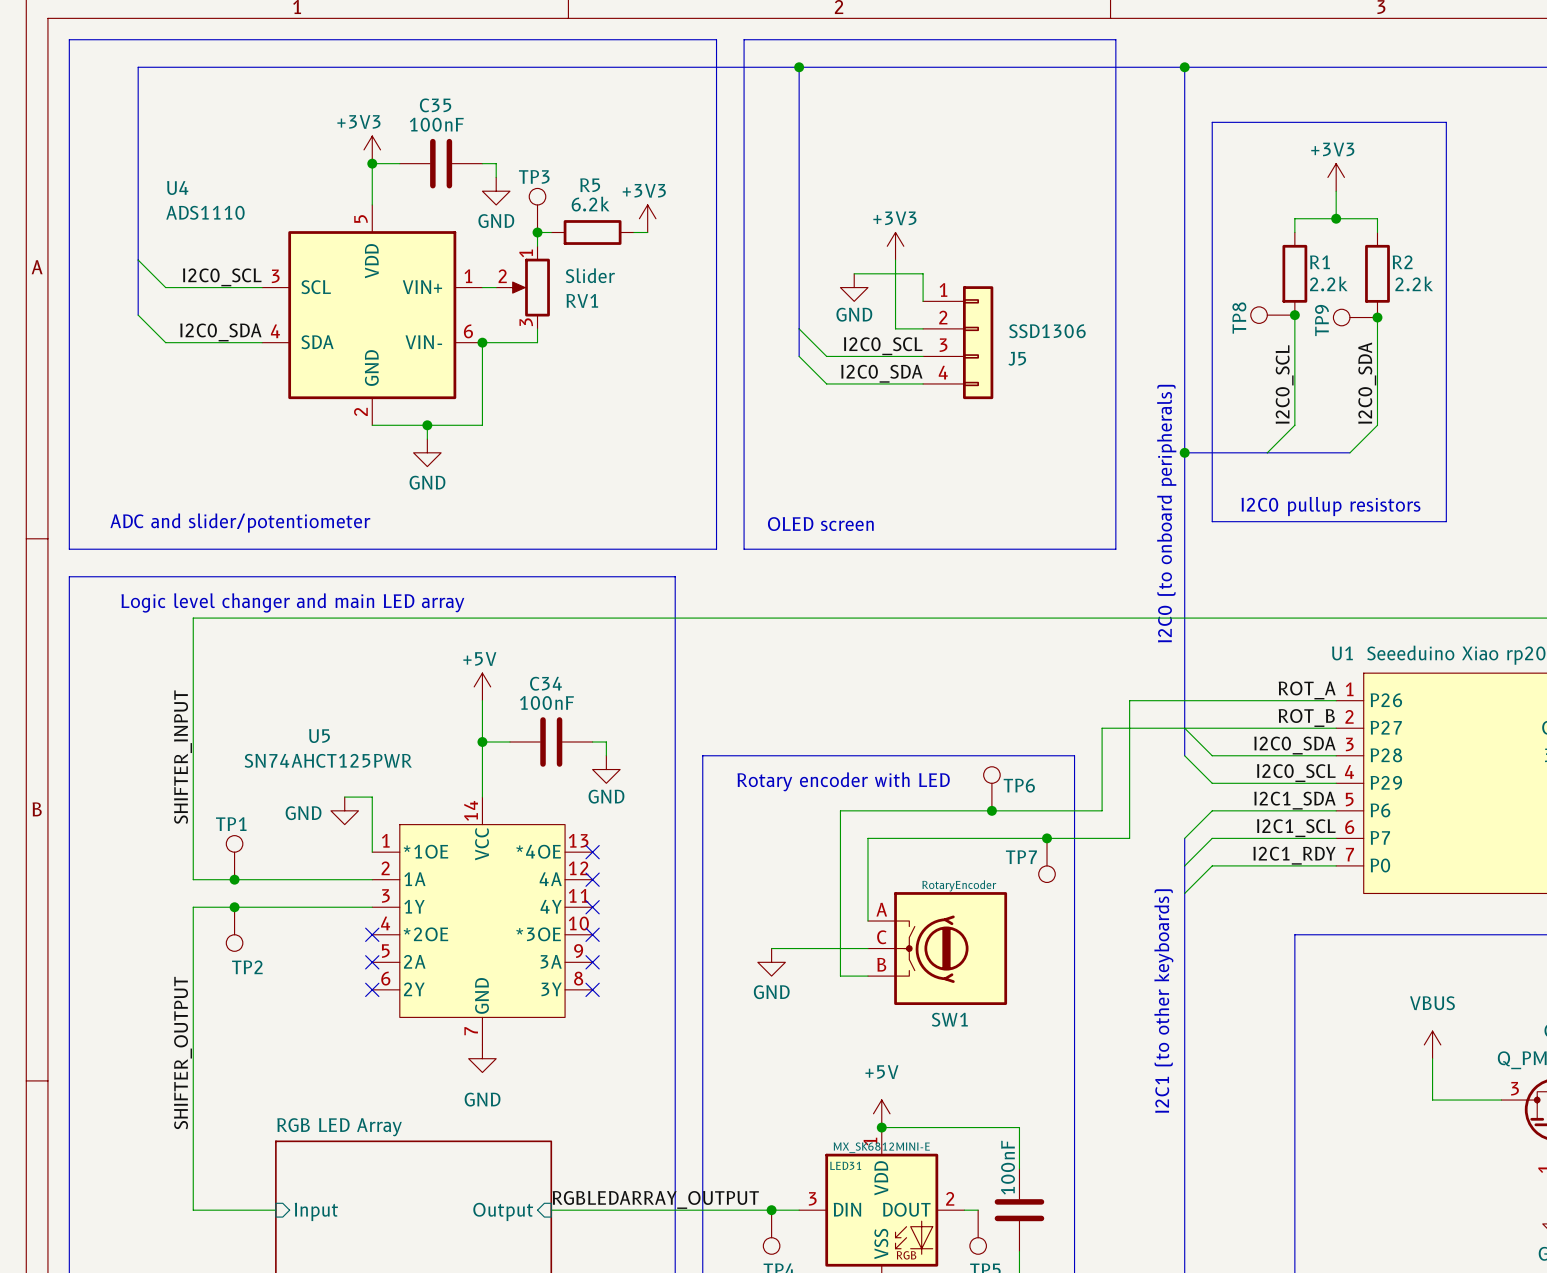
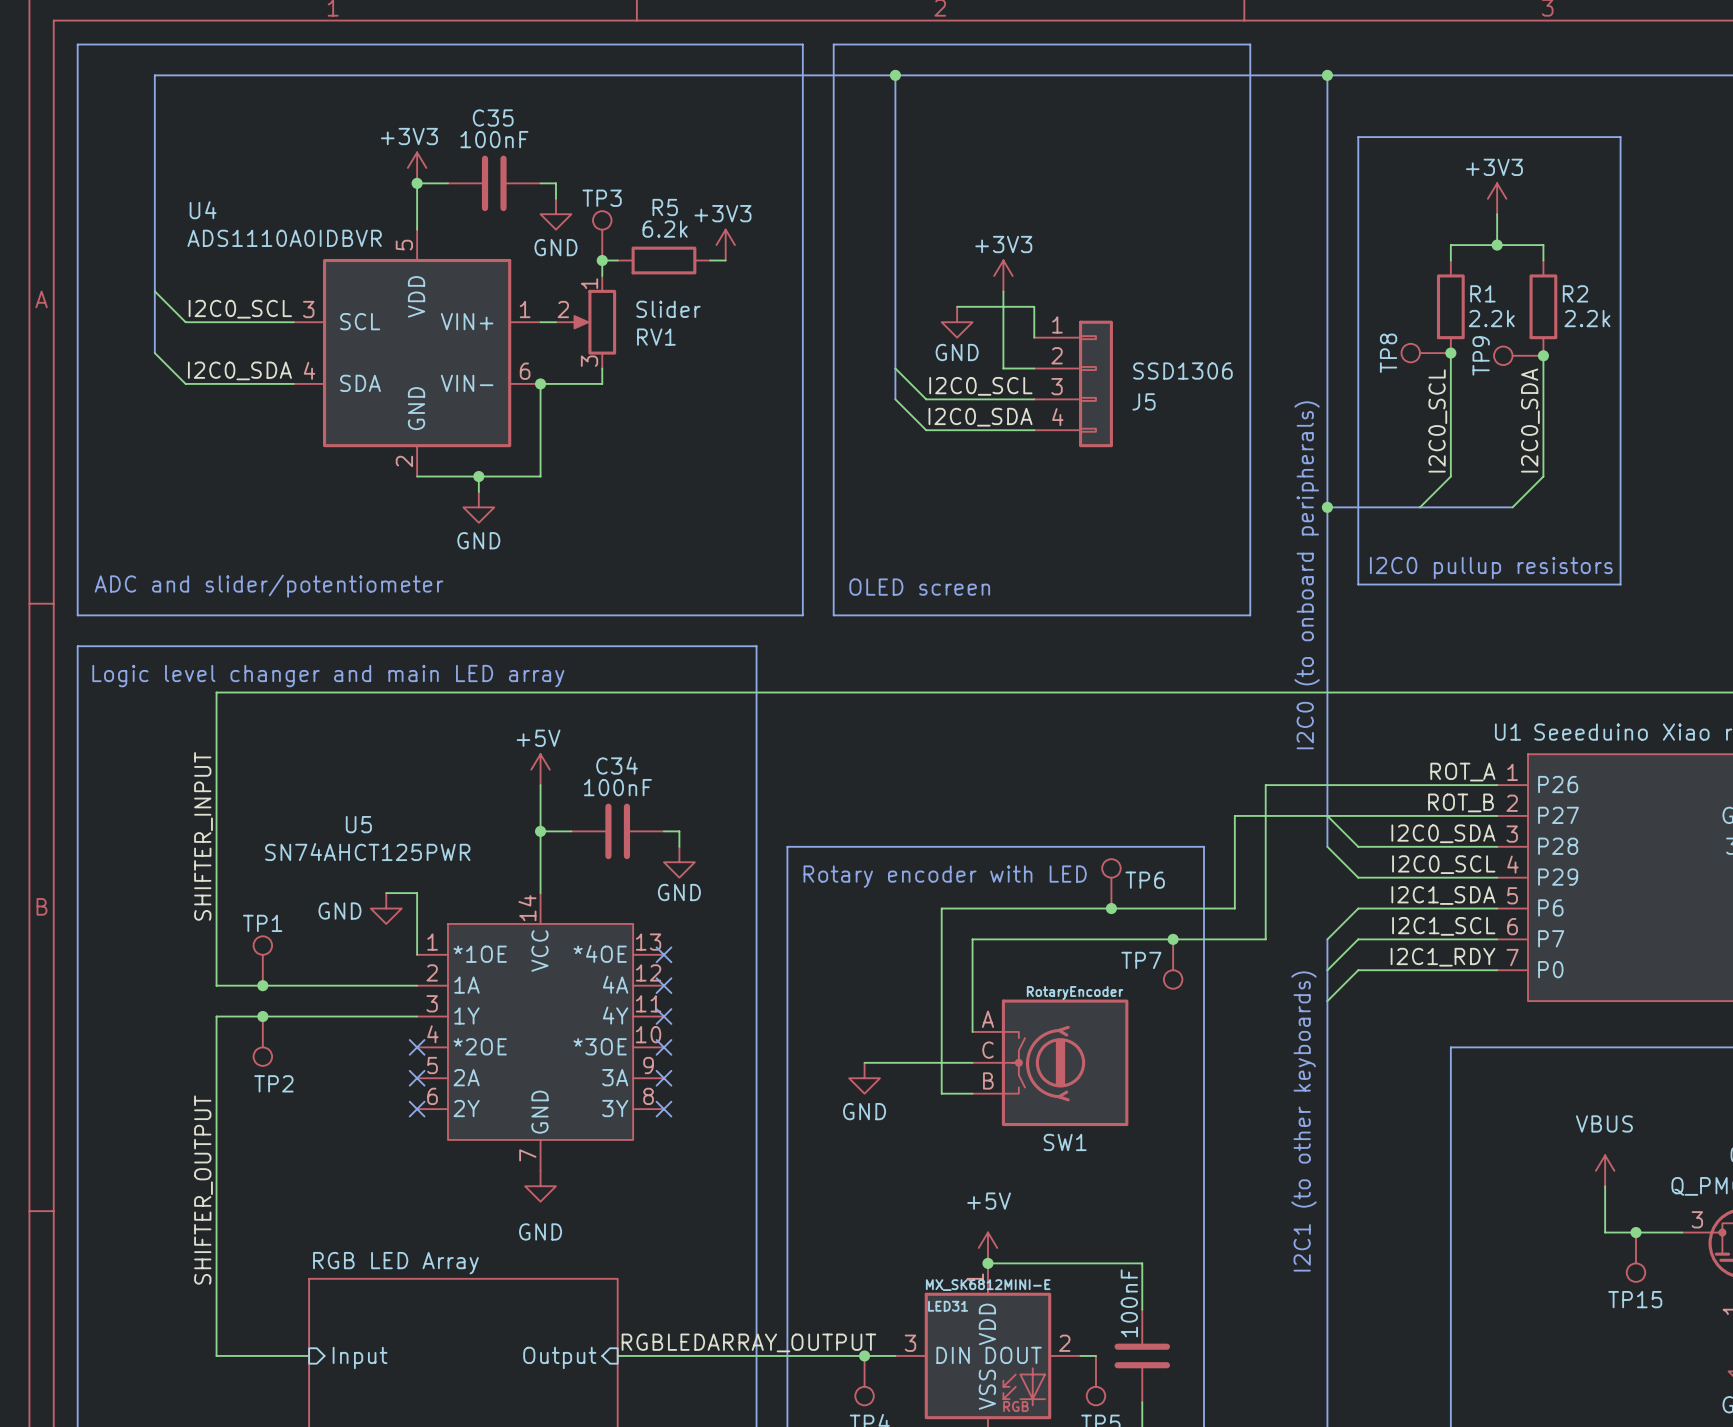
U4 value: ADS1110 (205, 212) -> ADS1110A0IDBVR (284, 238)
junction: none -> (1636, 1232)
TP15: none -> (1636, 1257)

